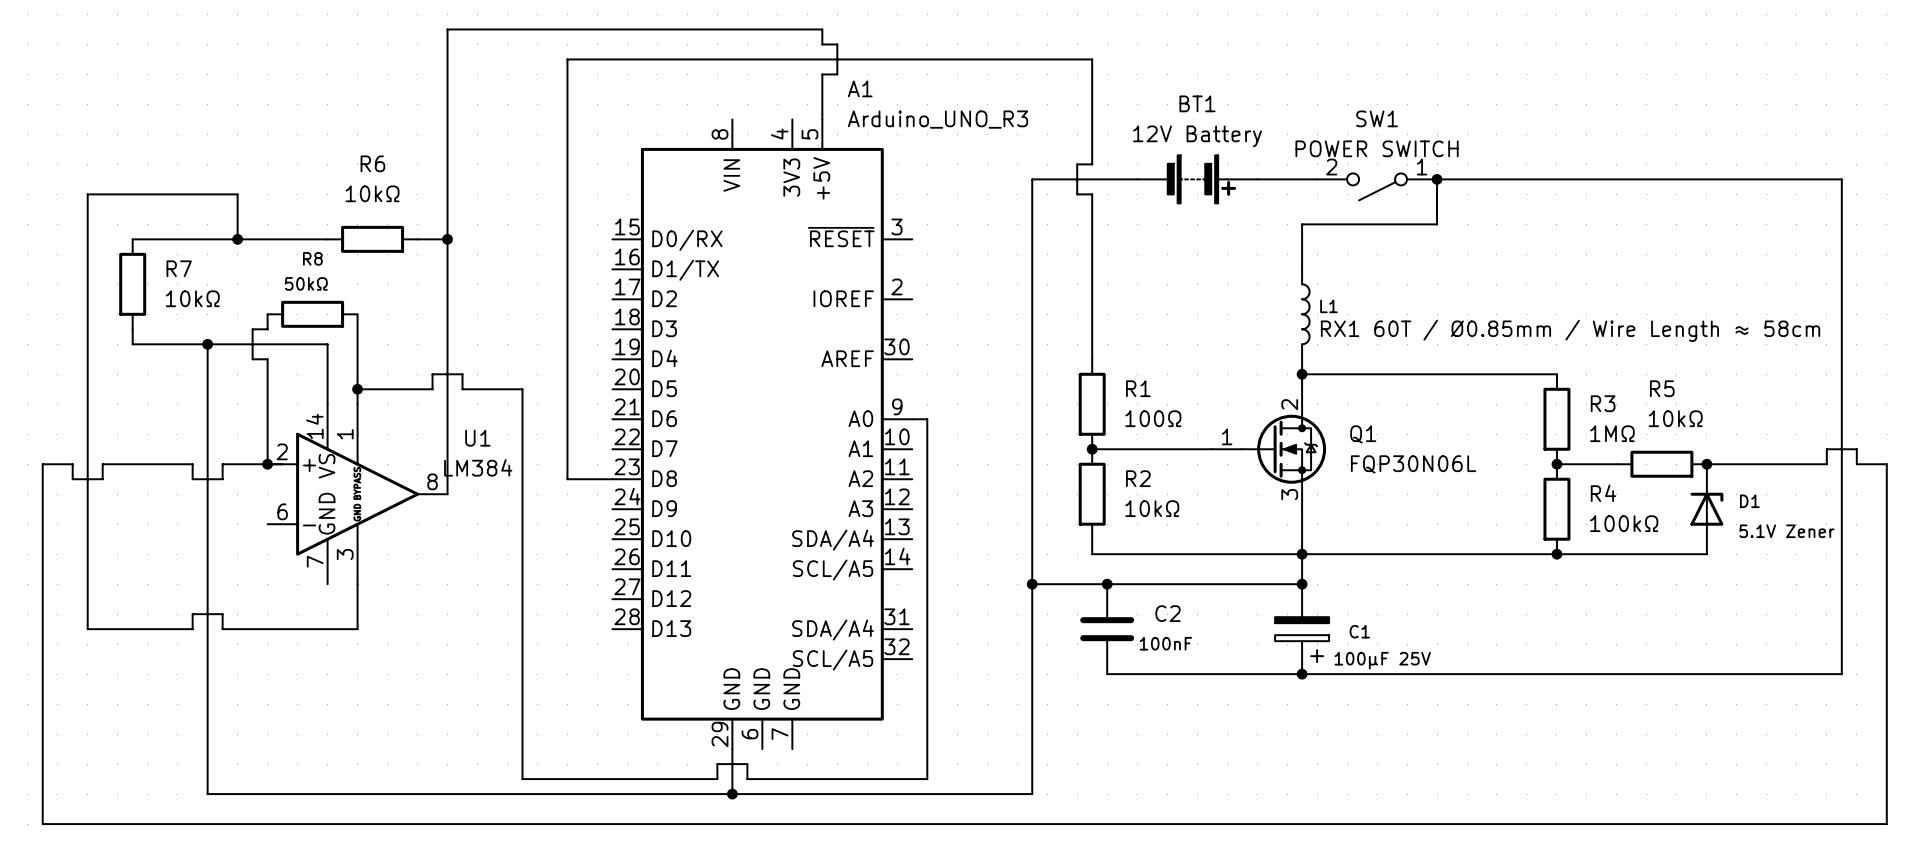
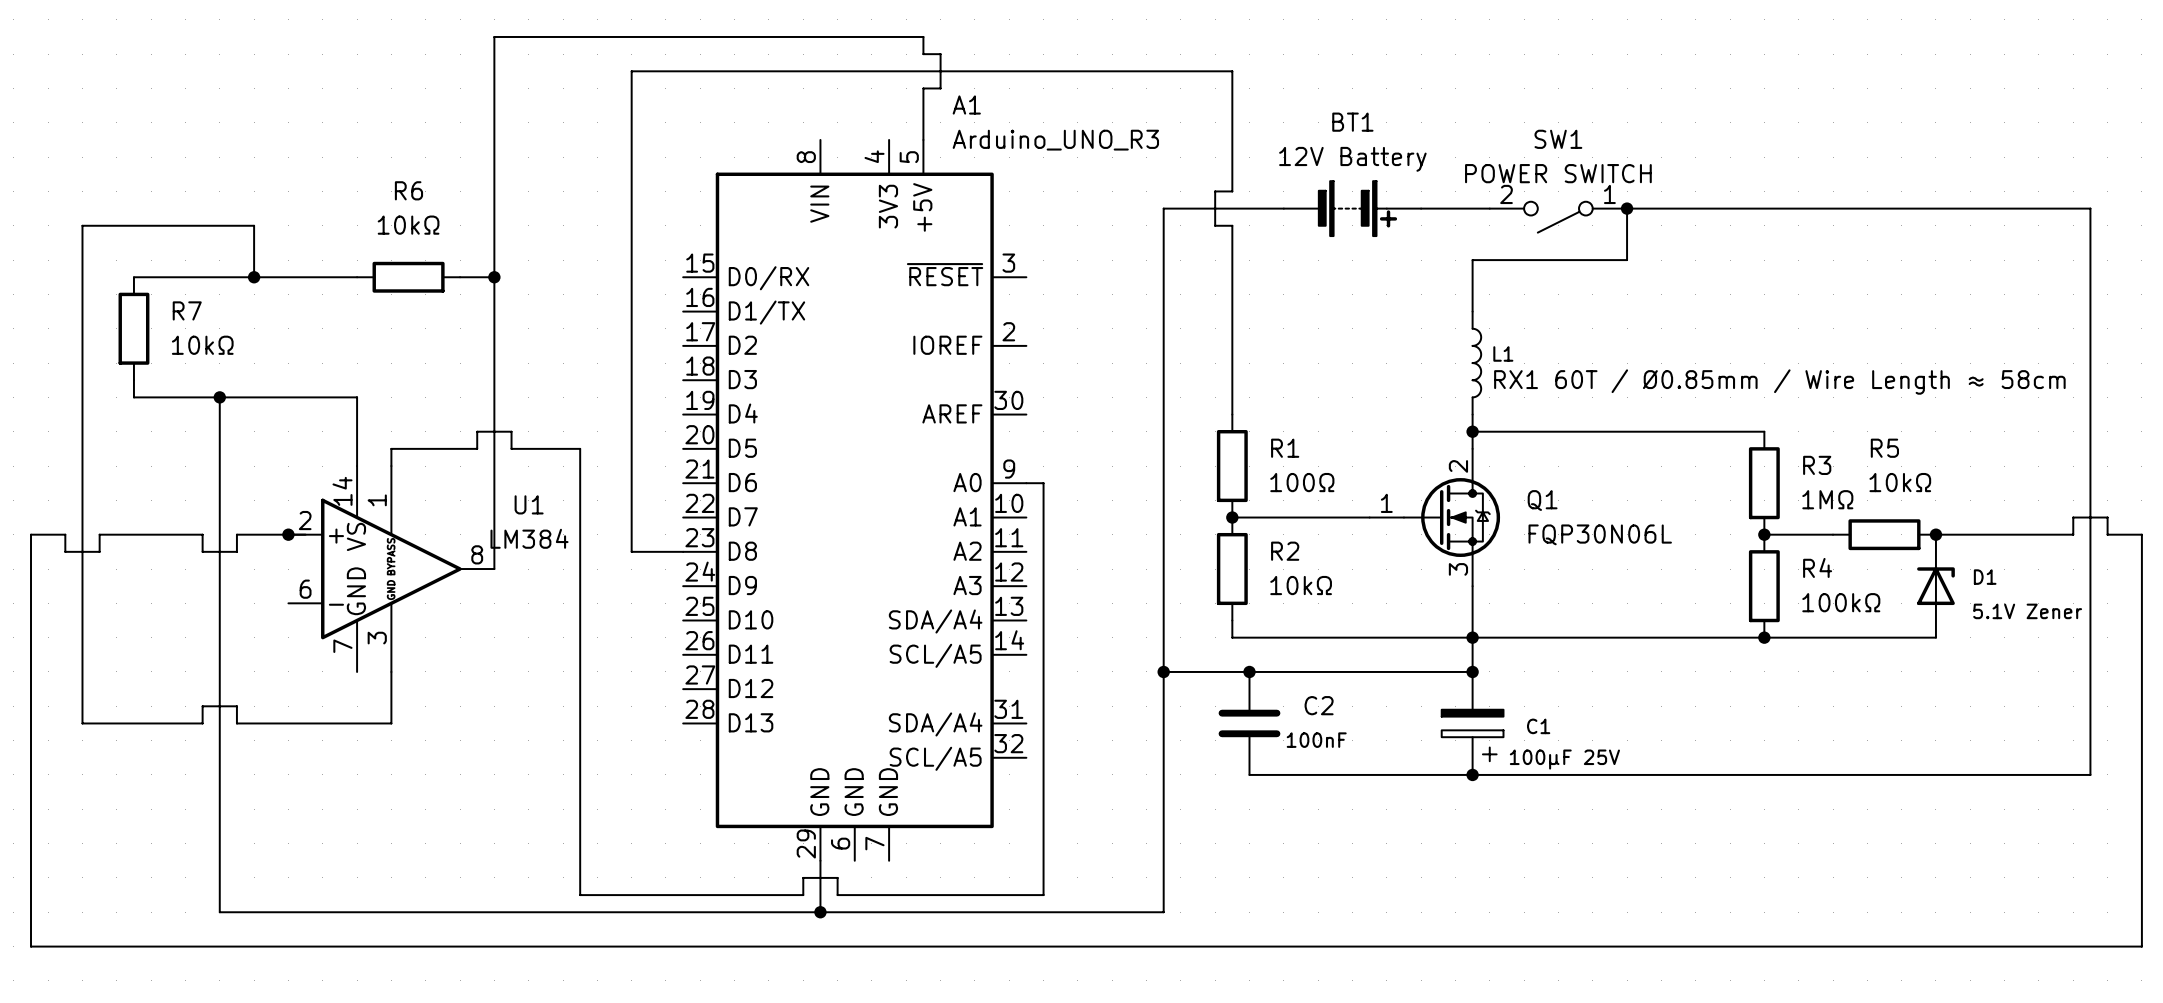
wire: (267, 314) (267, 329) (252, 329) (252, 359) (267, 359) (267, 464) -> none
R8: 50kΩ (312, 314) -> none
wire: (357, 314) (357, 389) -> none
junction: (357, 389) -> none

